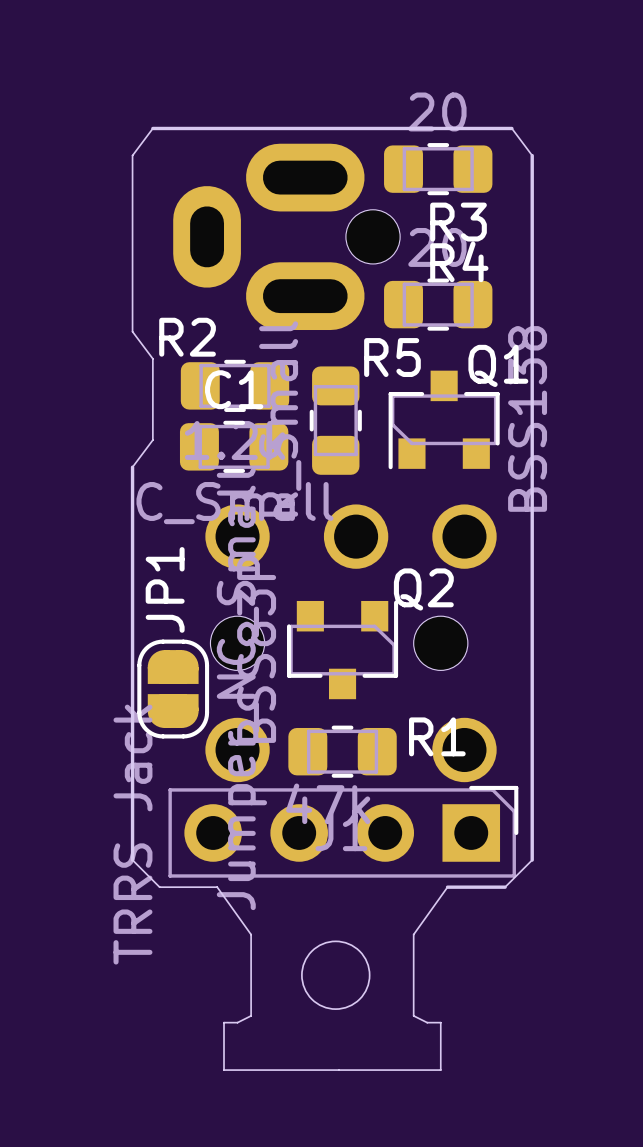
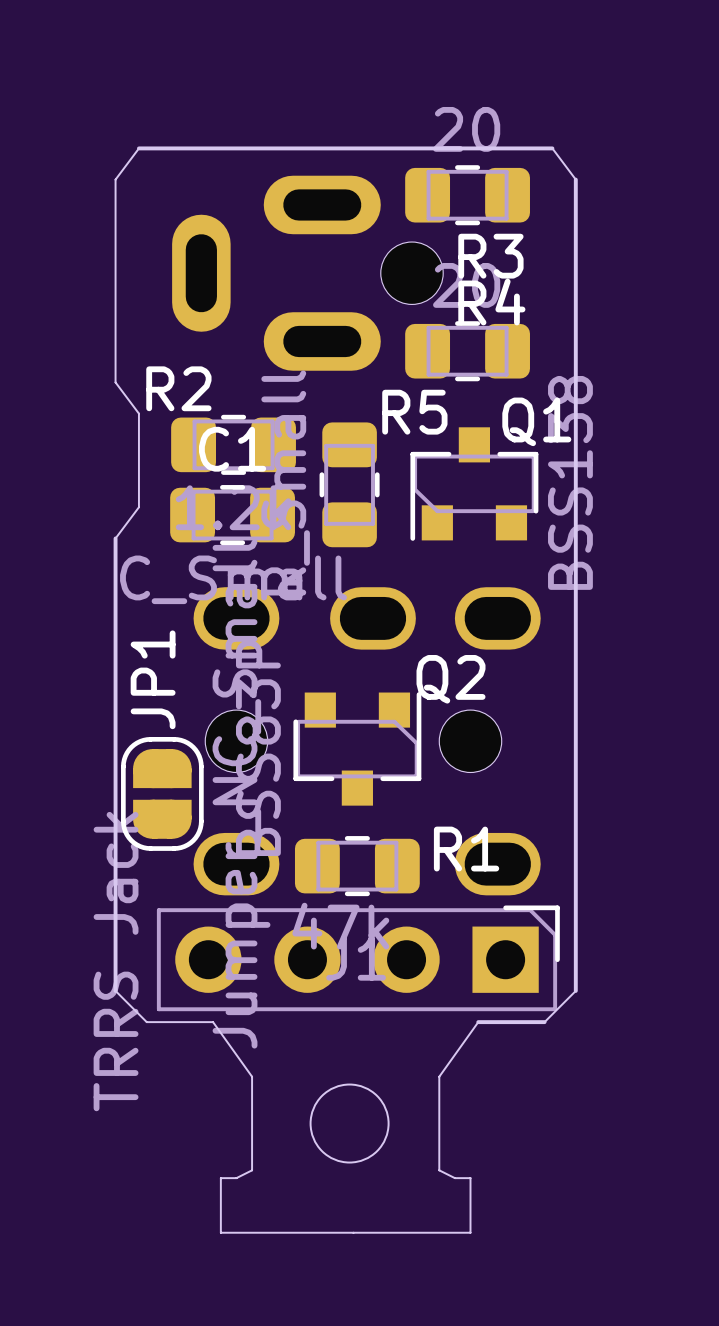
part footprint: [173, 143, 401, 331] -> [172, 175, 444, 371]
part footprint: [205, 504, 497, 783] -> [193, 587, 541, 896]

